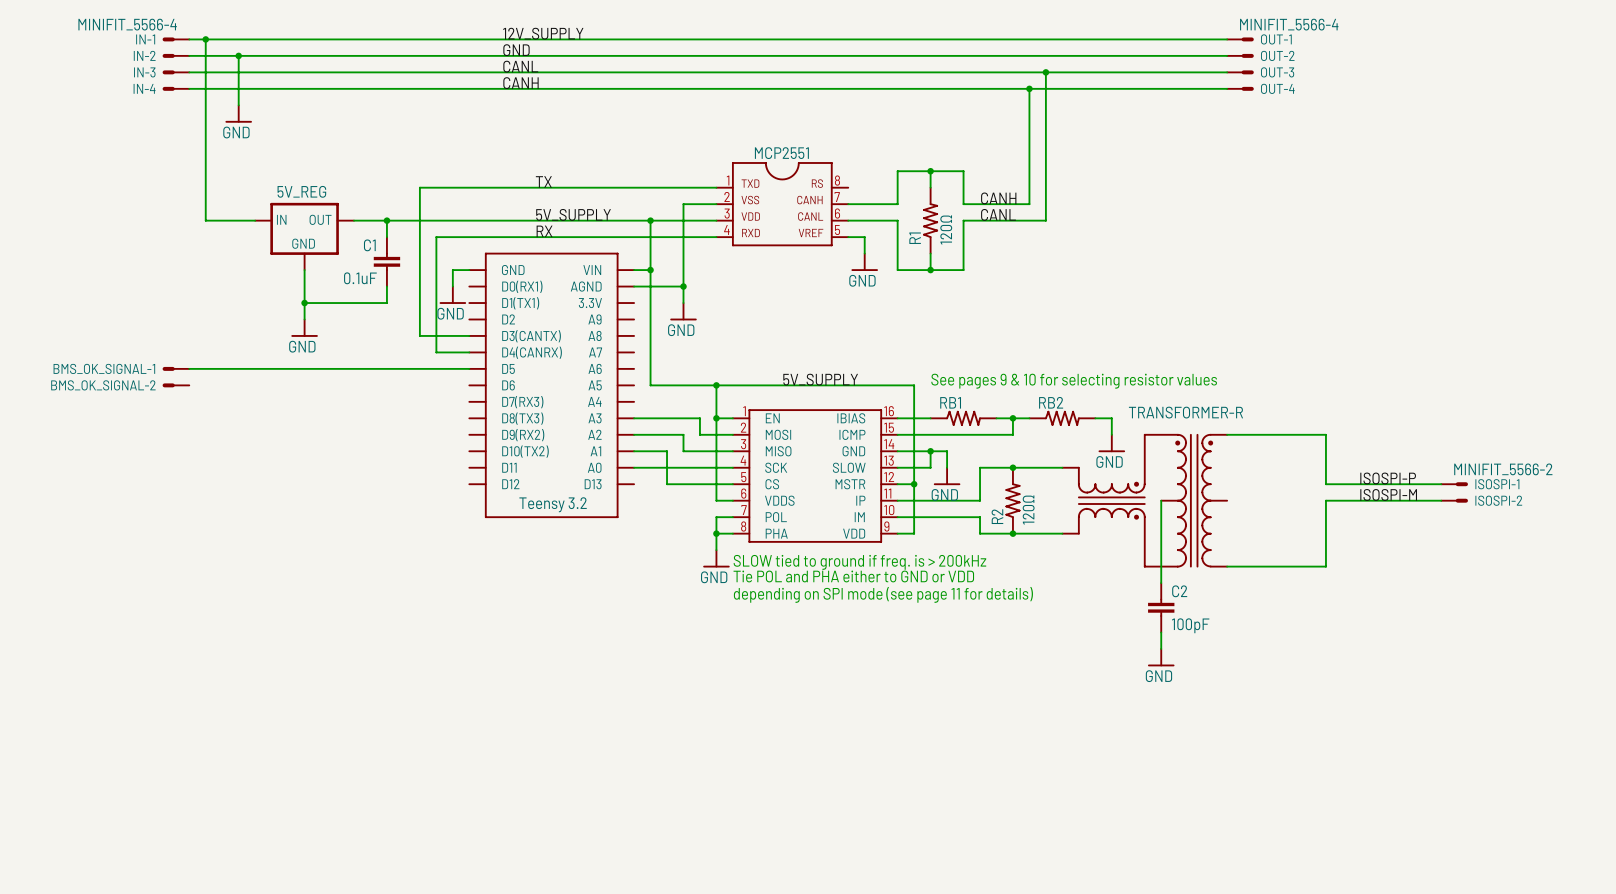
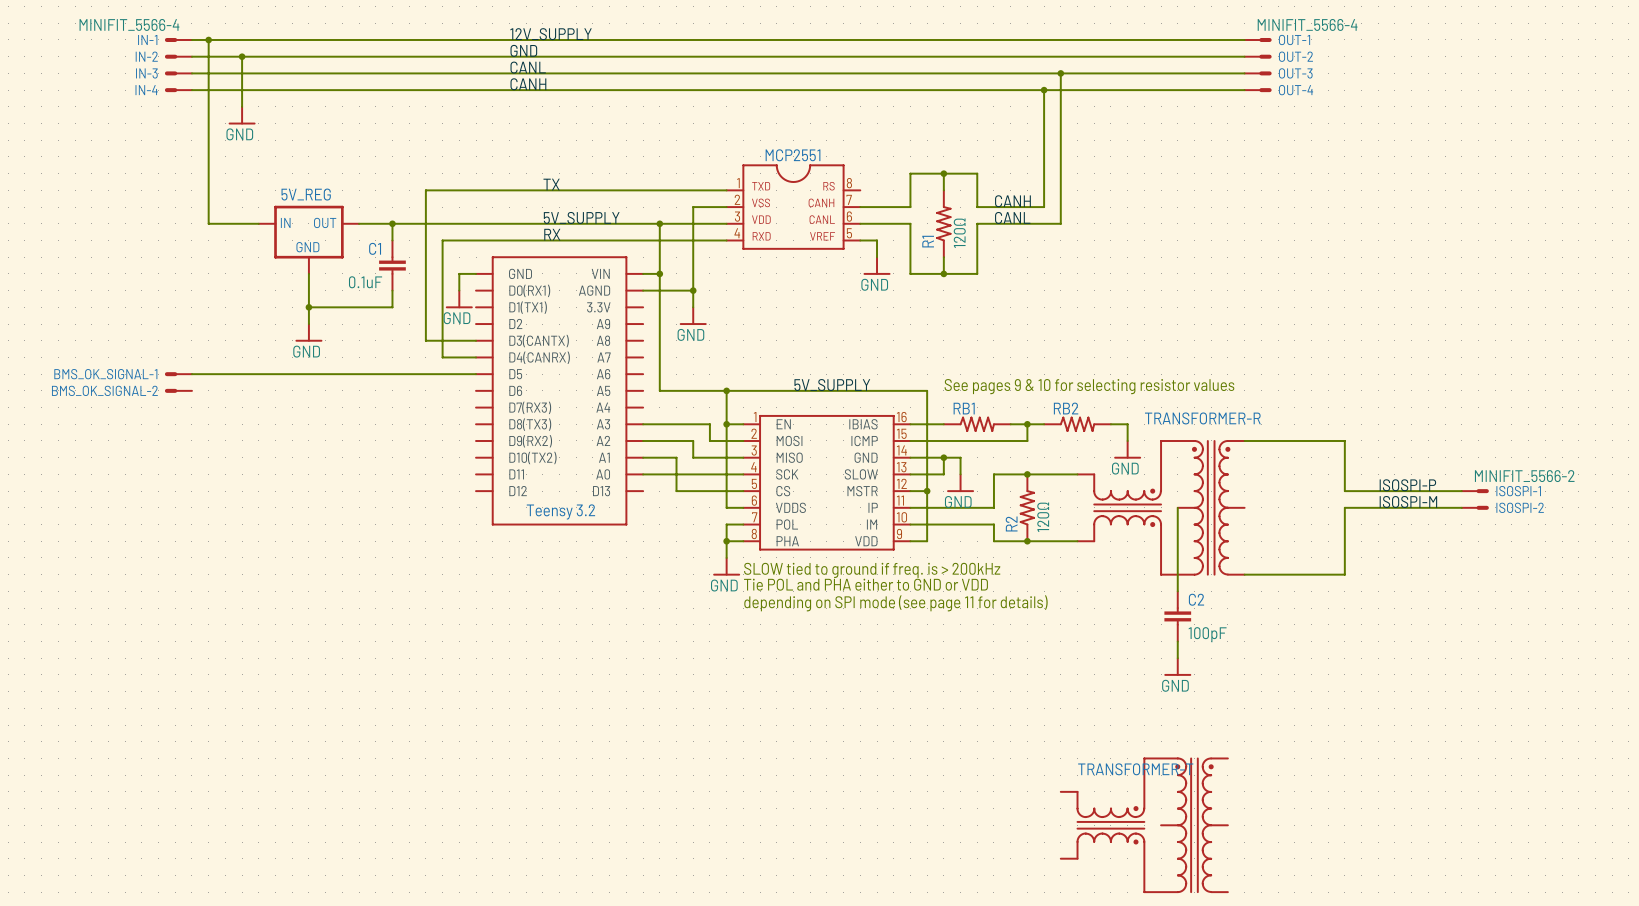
TRANSFORMER-T: none -> (1144, 825)

